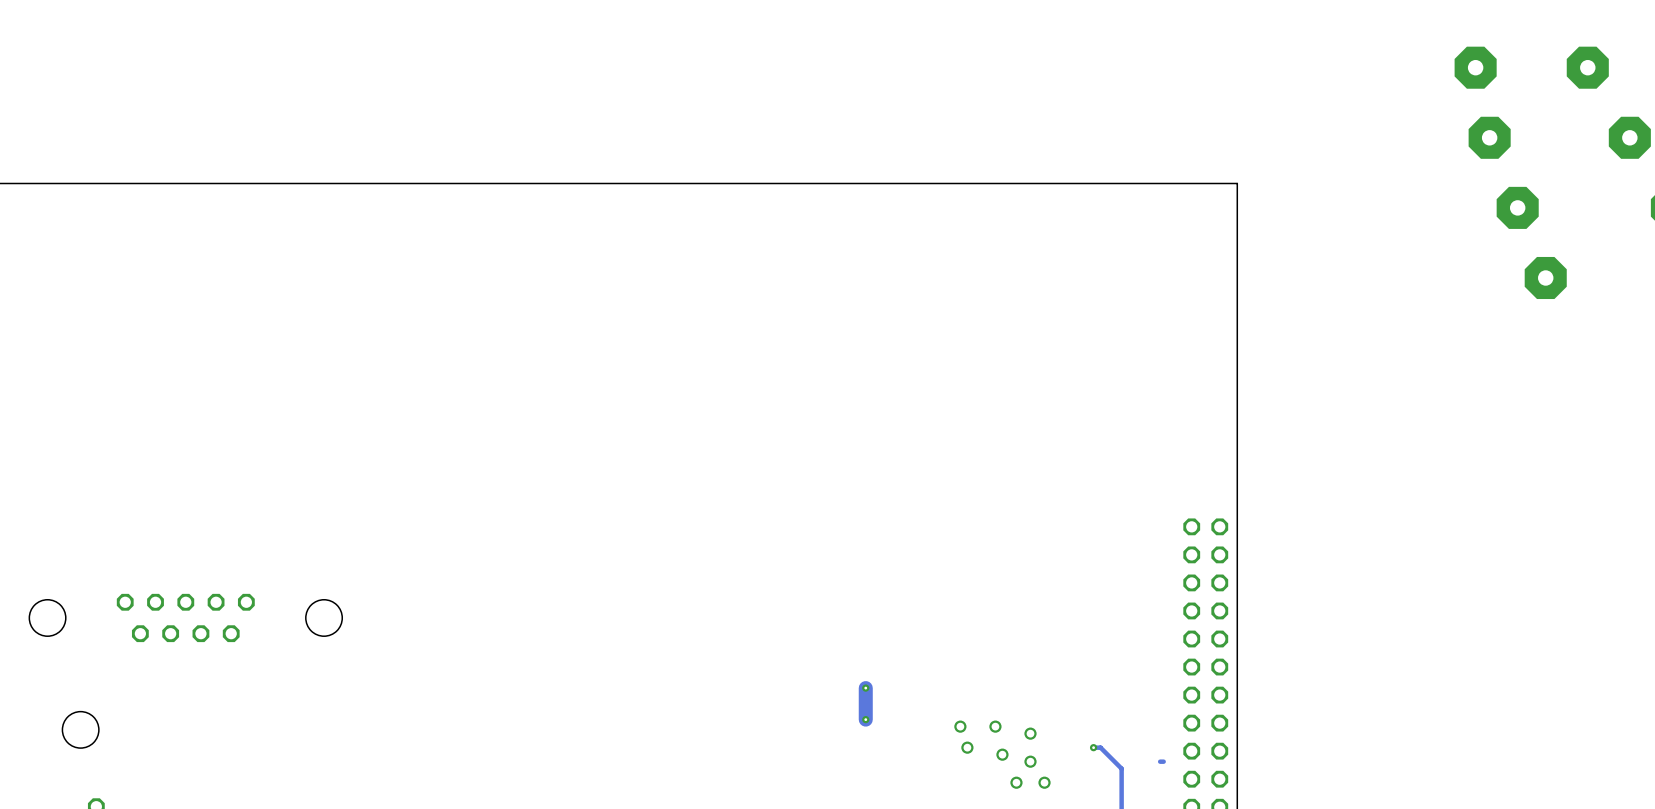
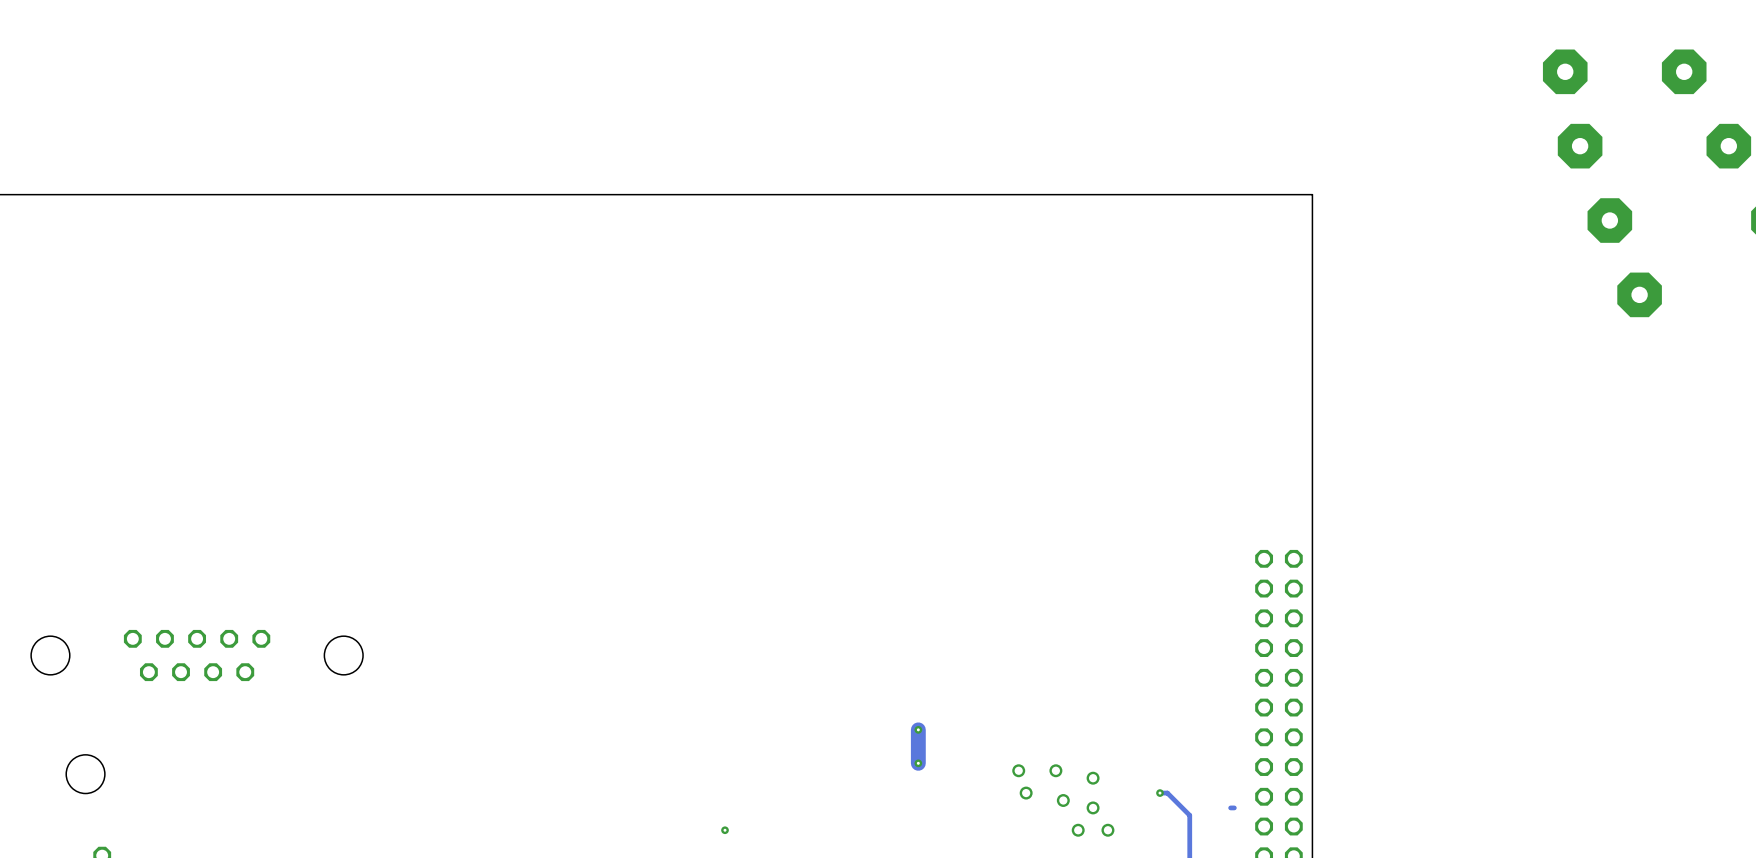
via: none -> (725, 830)

